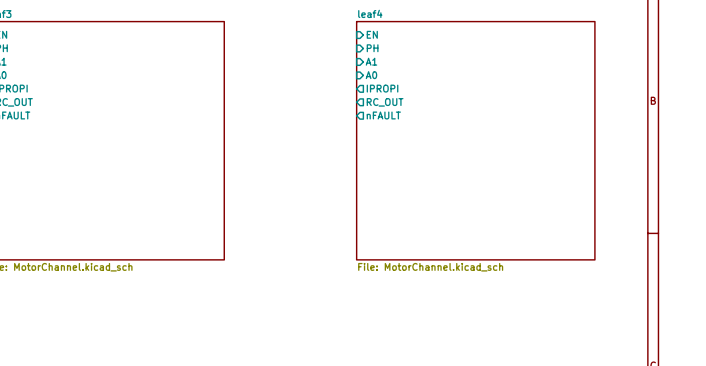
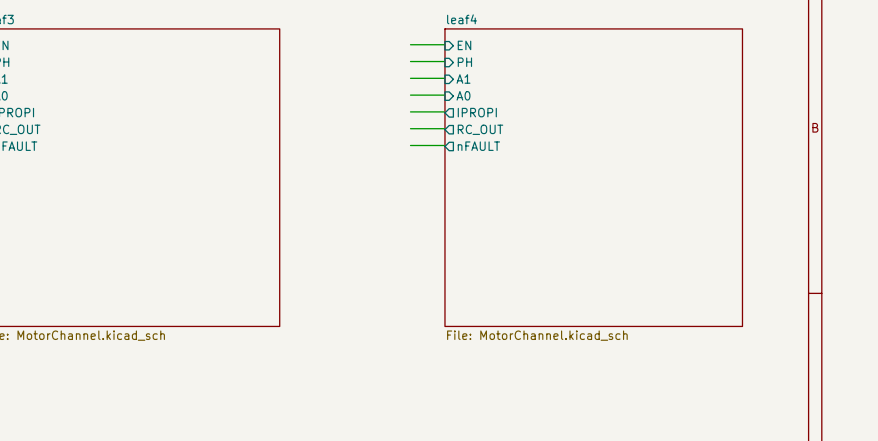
wire: none -> (410, 44) (444, 44)
wire: none -> (410, 61) (444, 61)
wire: none -> (410, 78) (444, 78)
wire: none -> (410, 95) (444, 95)
wire: none -> (410, 111) (444, 111)
wire: none -> (410, 128) (444, 128)
wire: none -> (410, 145) (444, 145)

